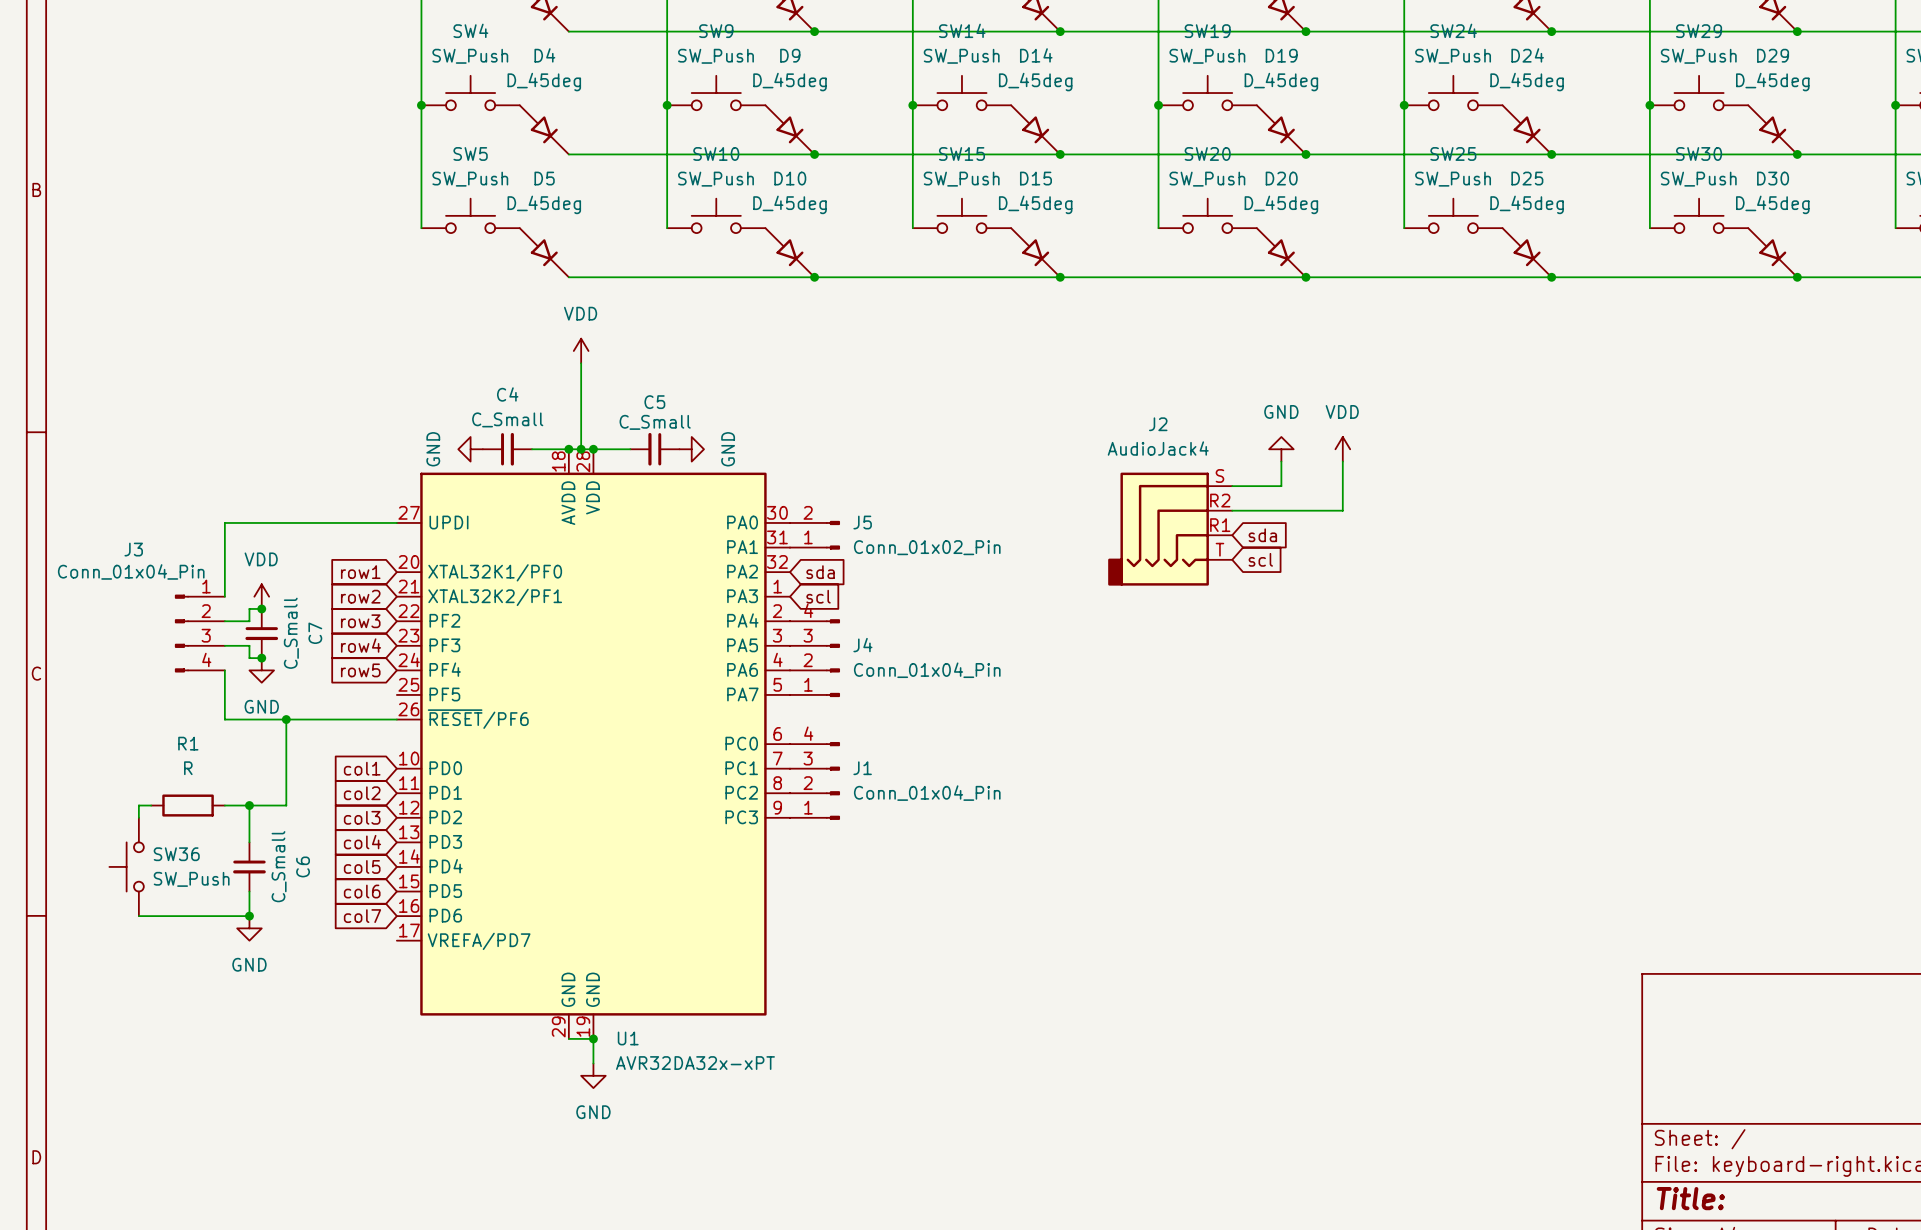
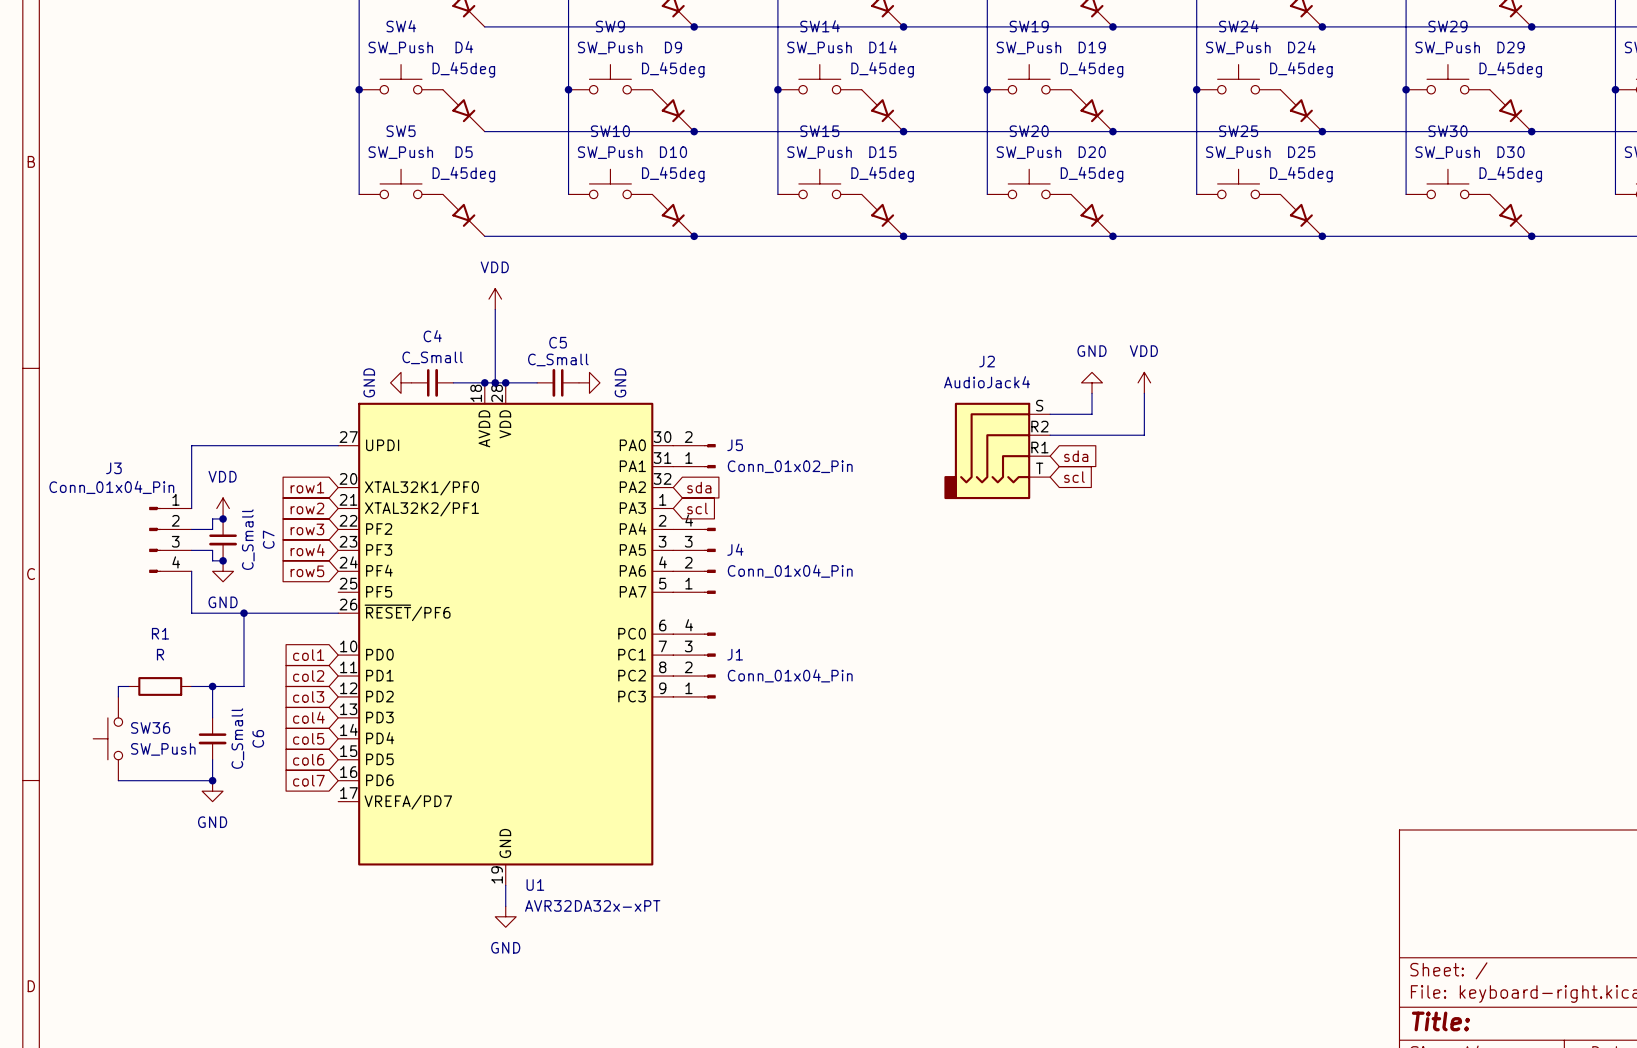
U1 symbol: [396, 449, 790, 1039] -> [338, 382, 674, 886]
wire: (568, 1038) (593, 1038) -> none
junction: (593, 1038) -> none

